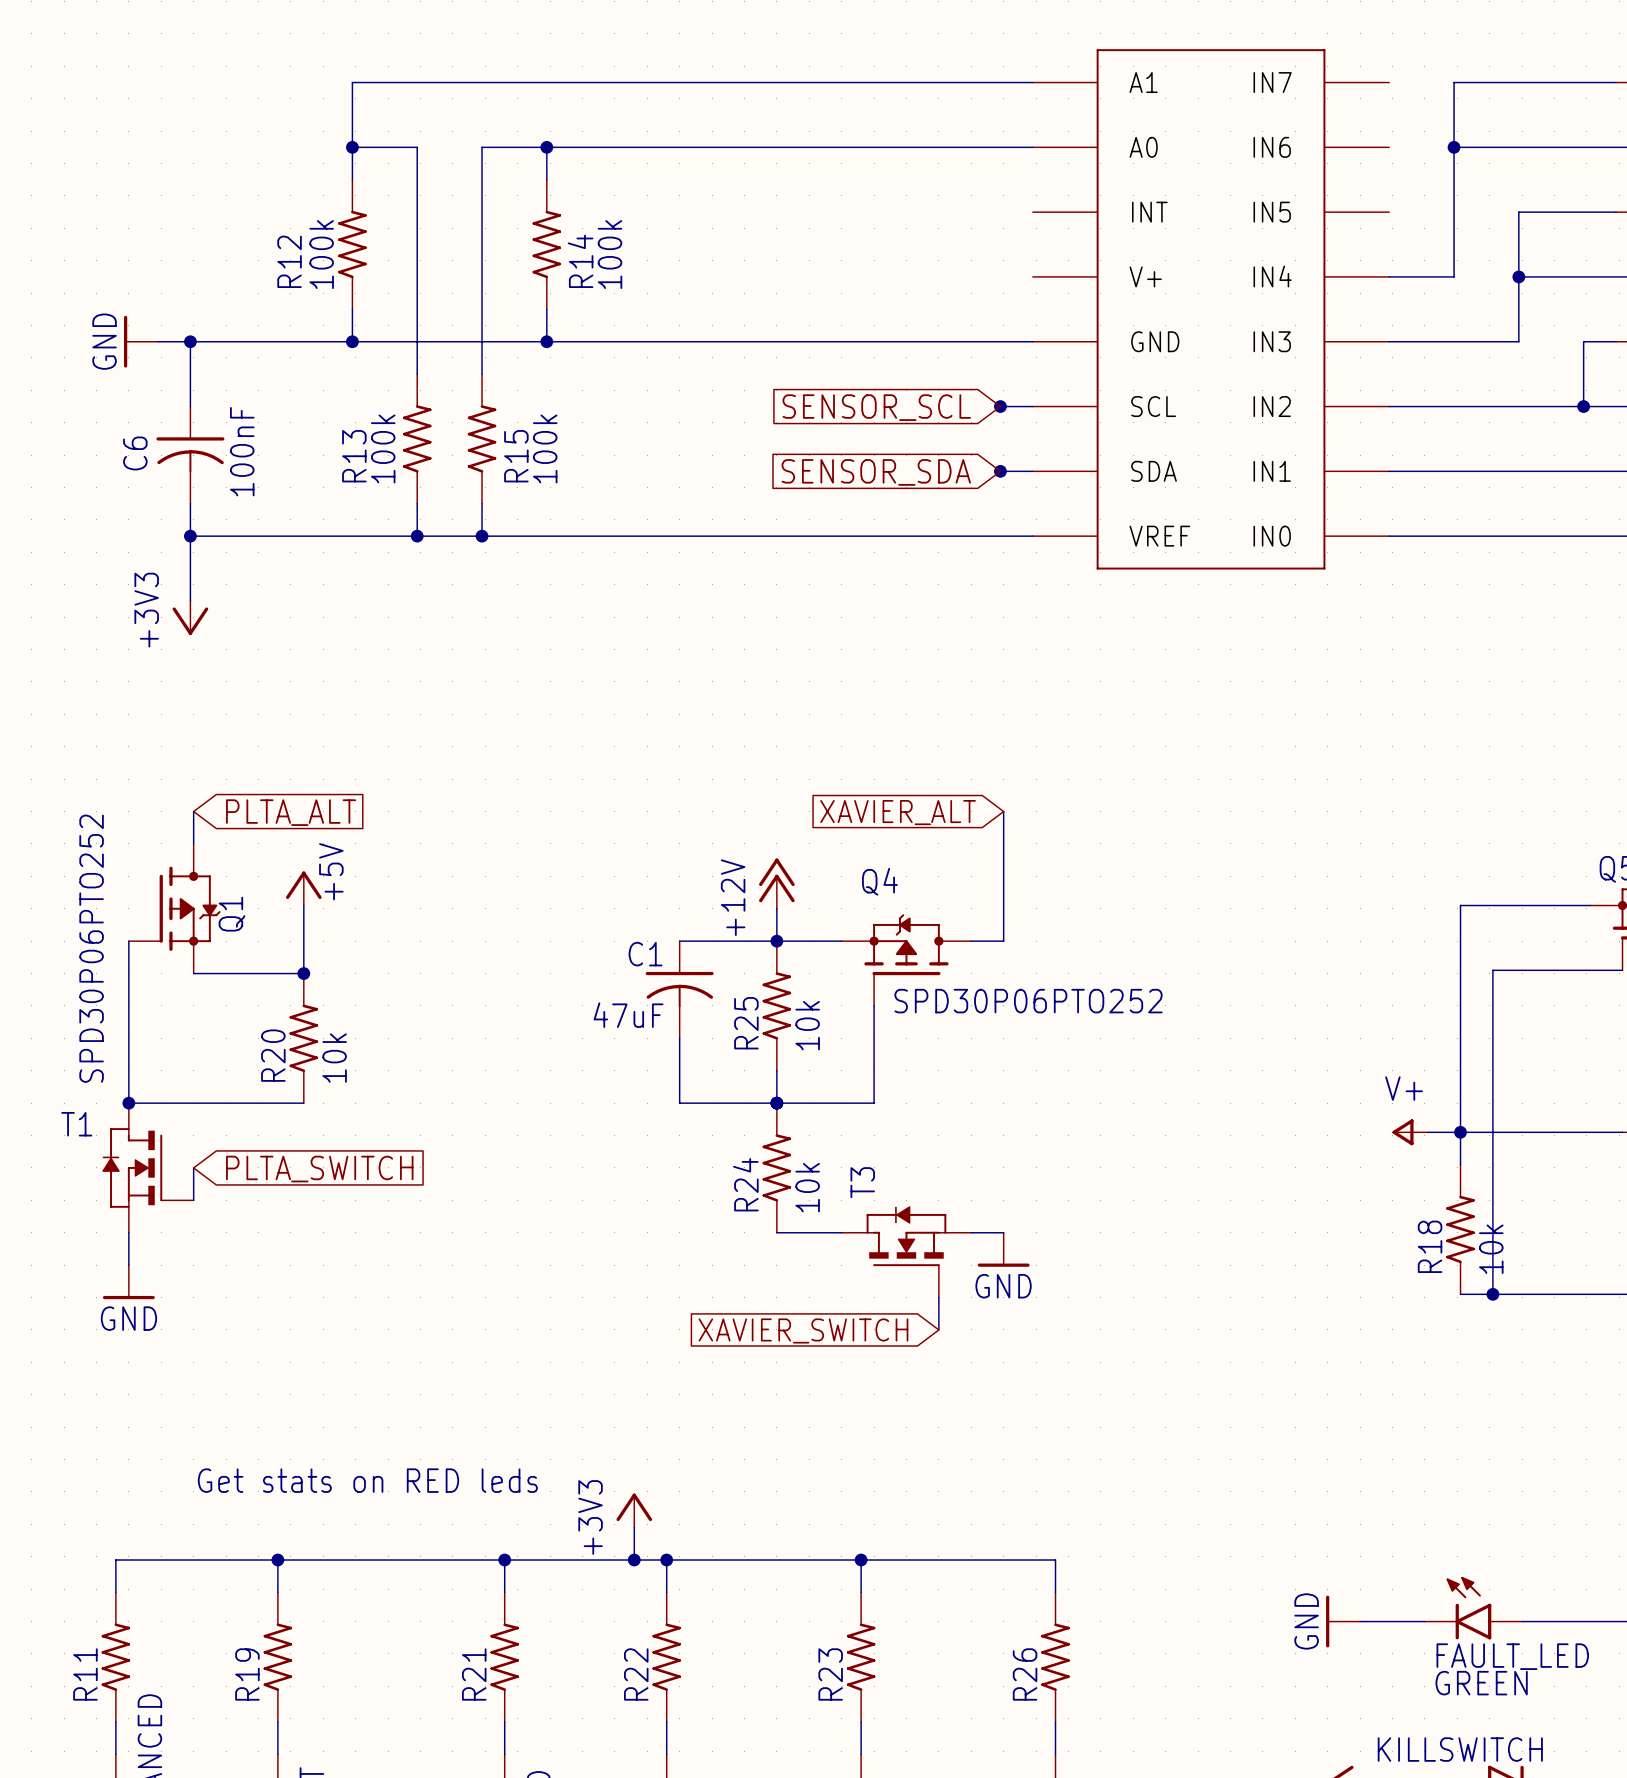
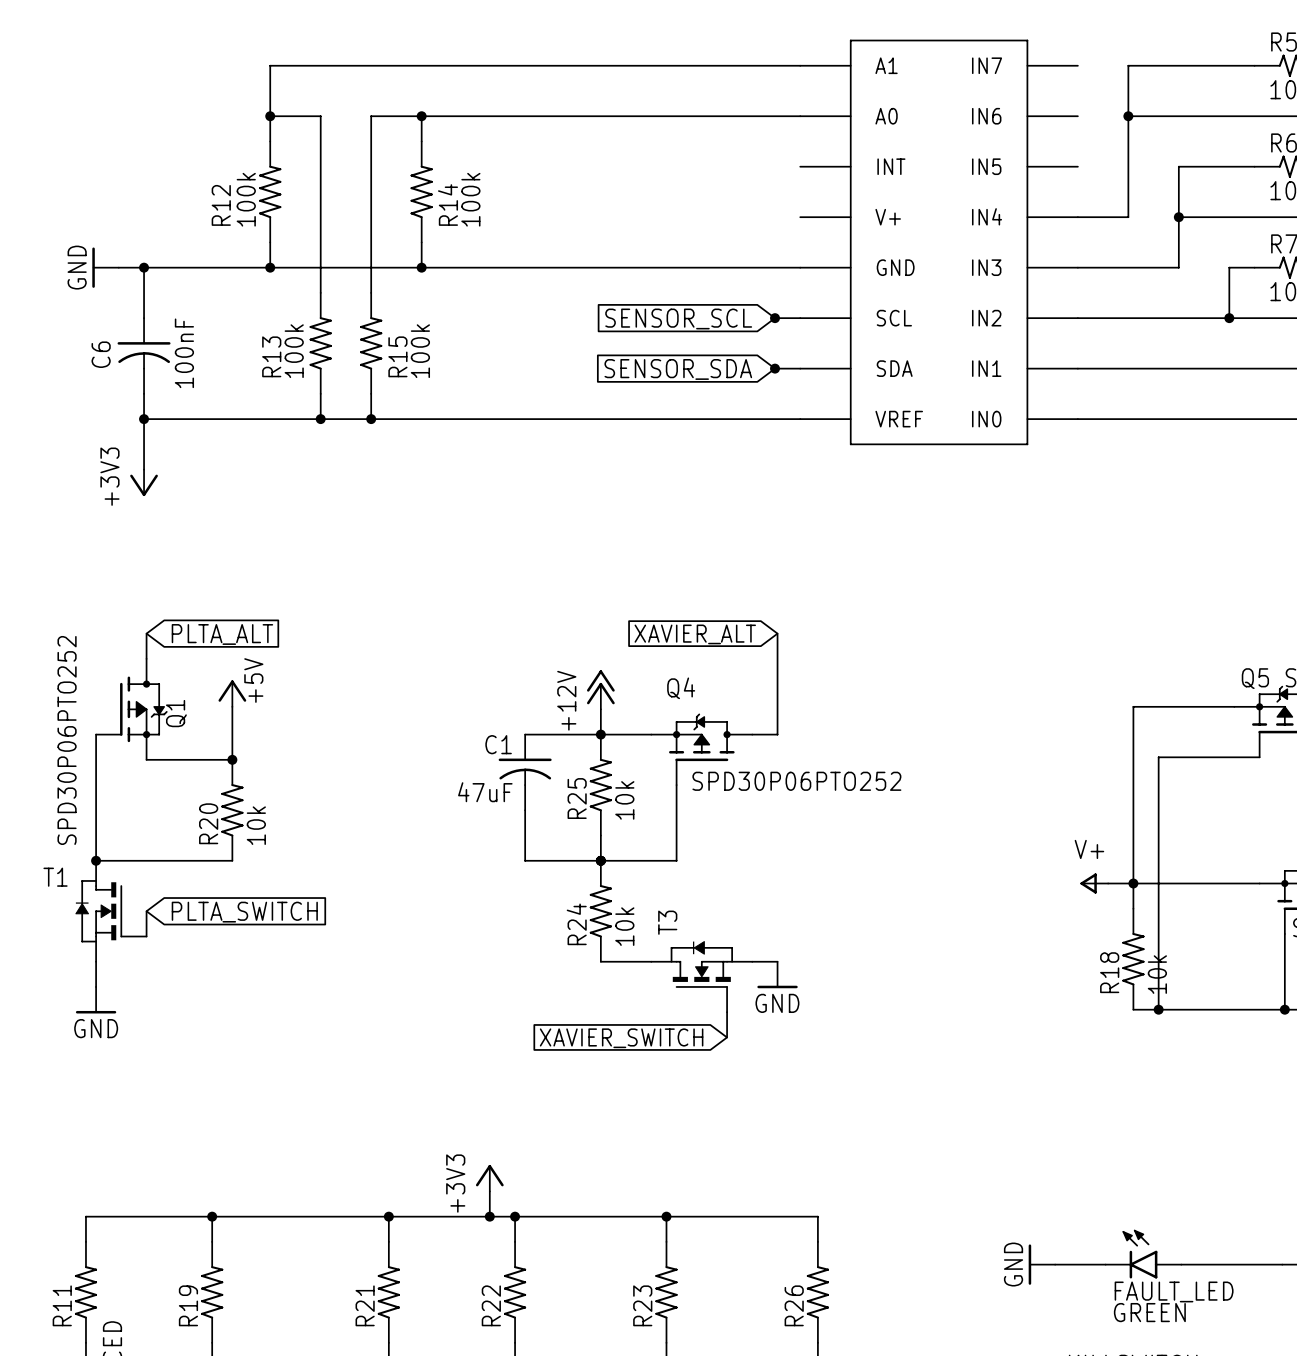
text: Get stats on RED leds (367, 1480) -> none

